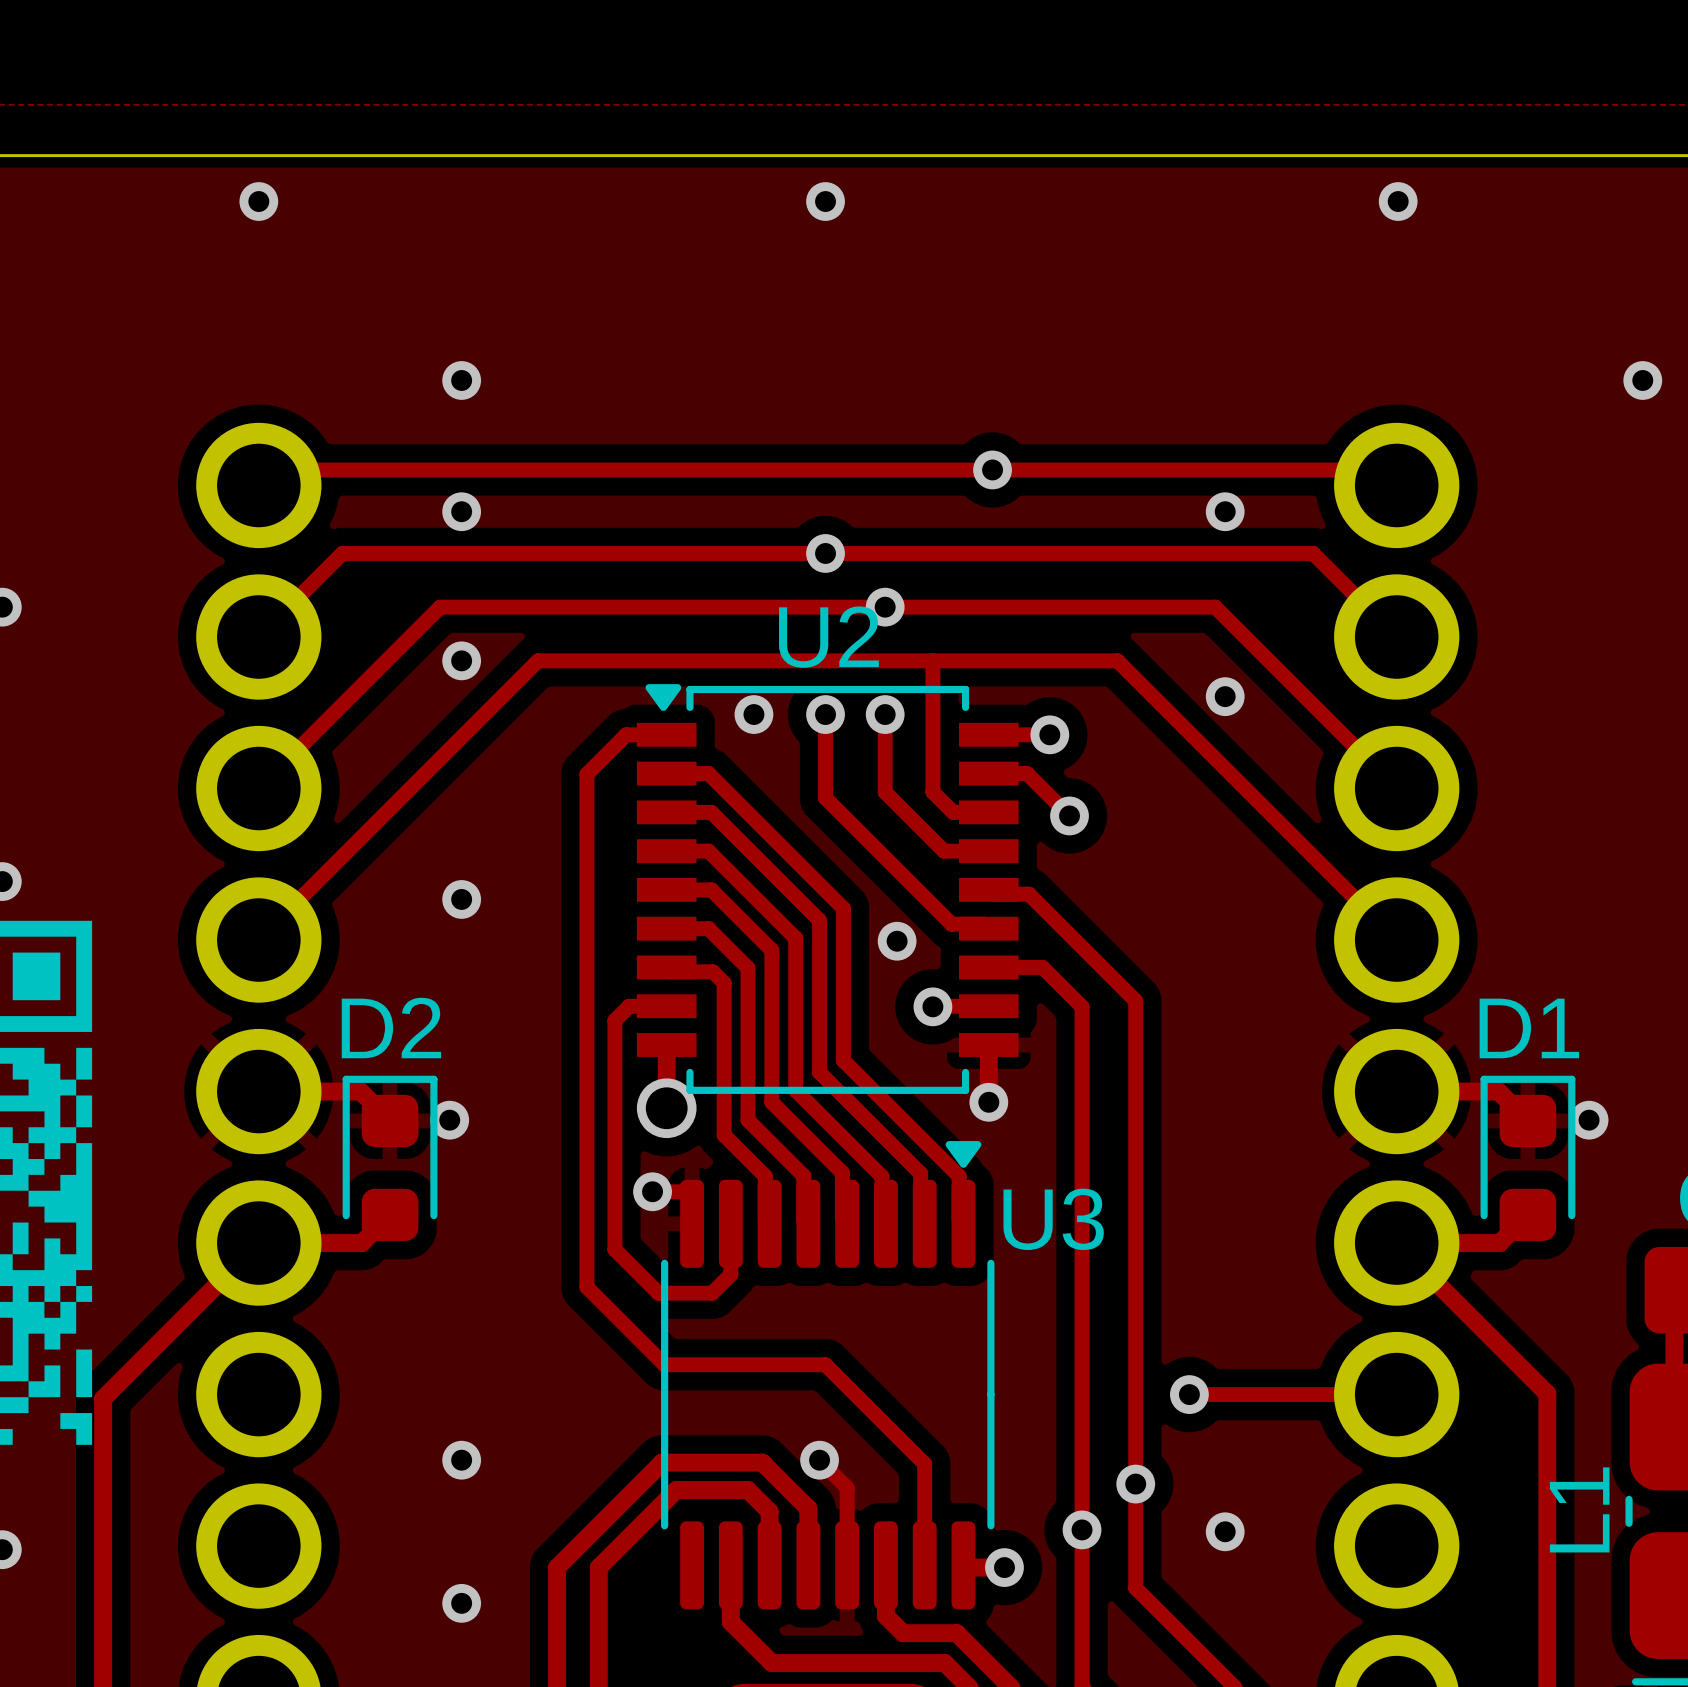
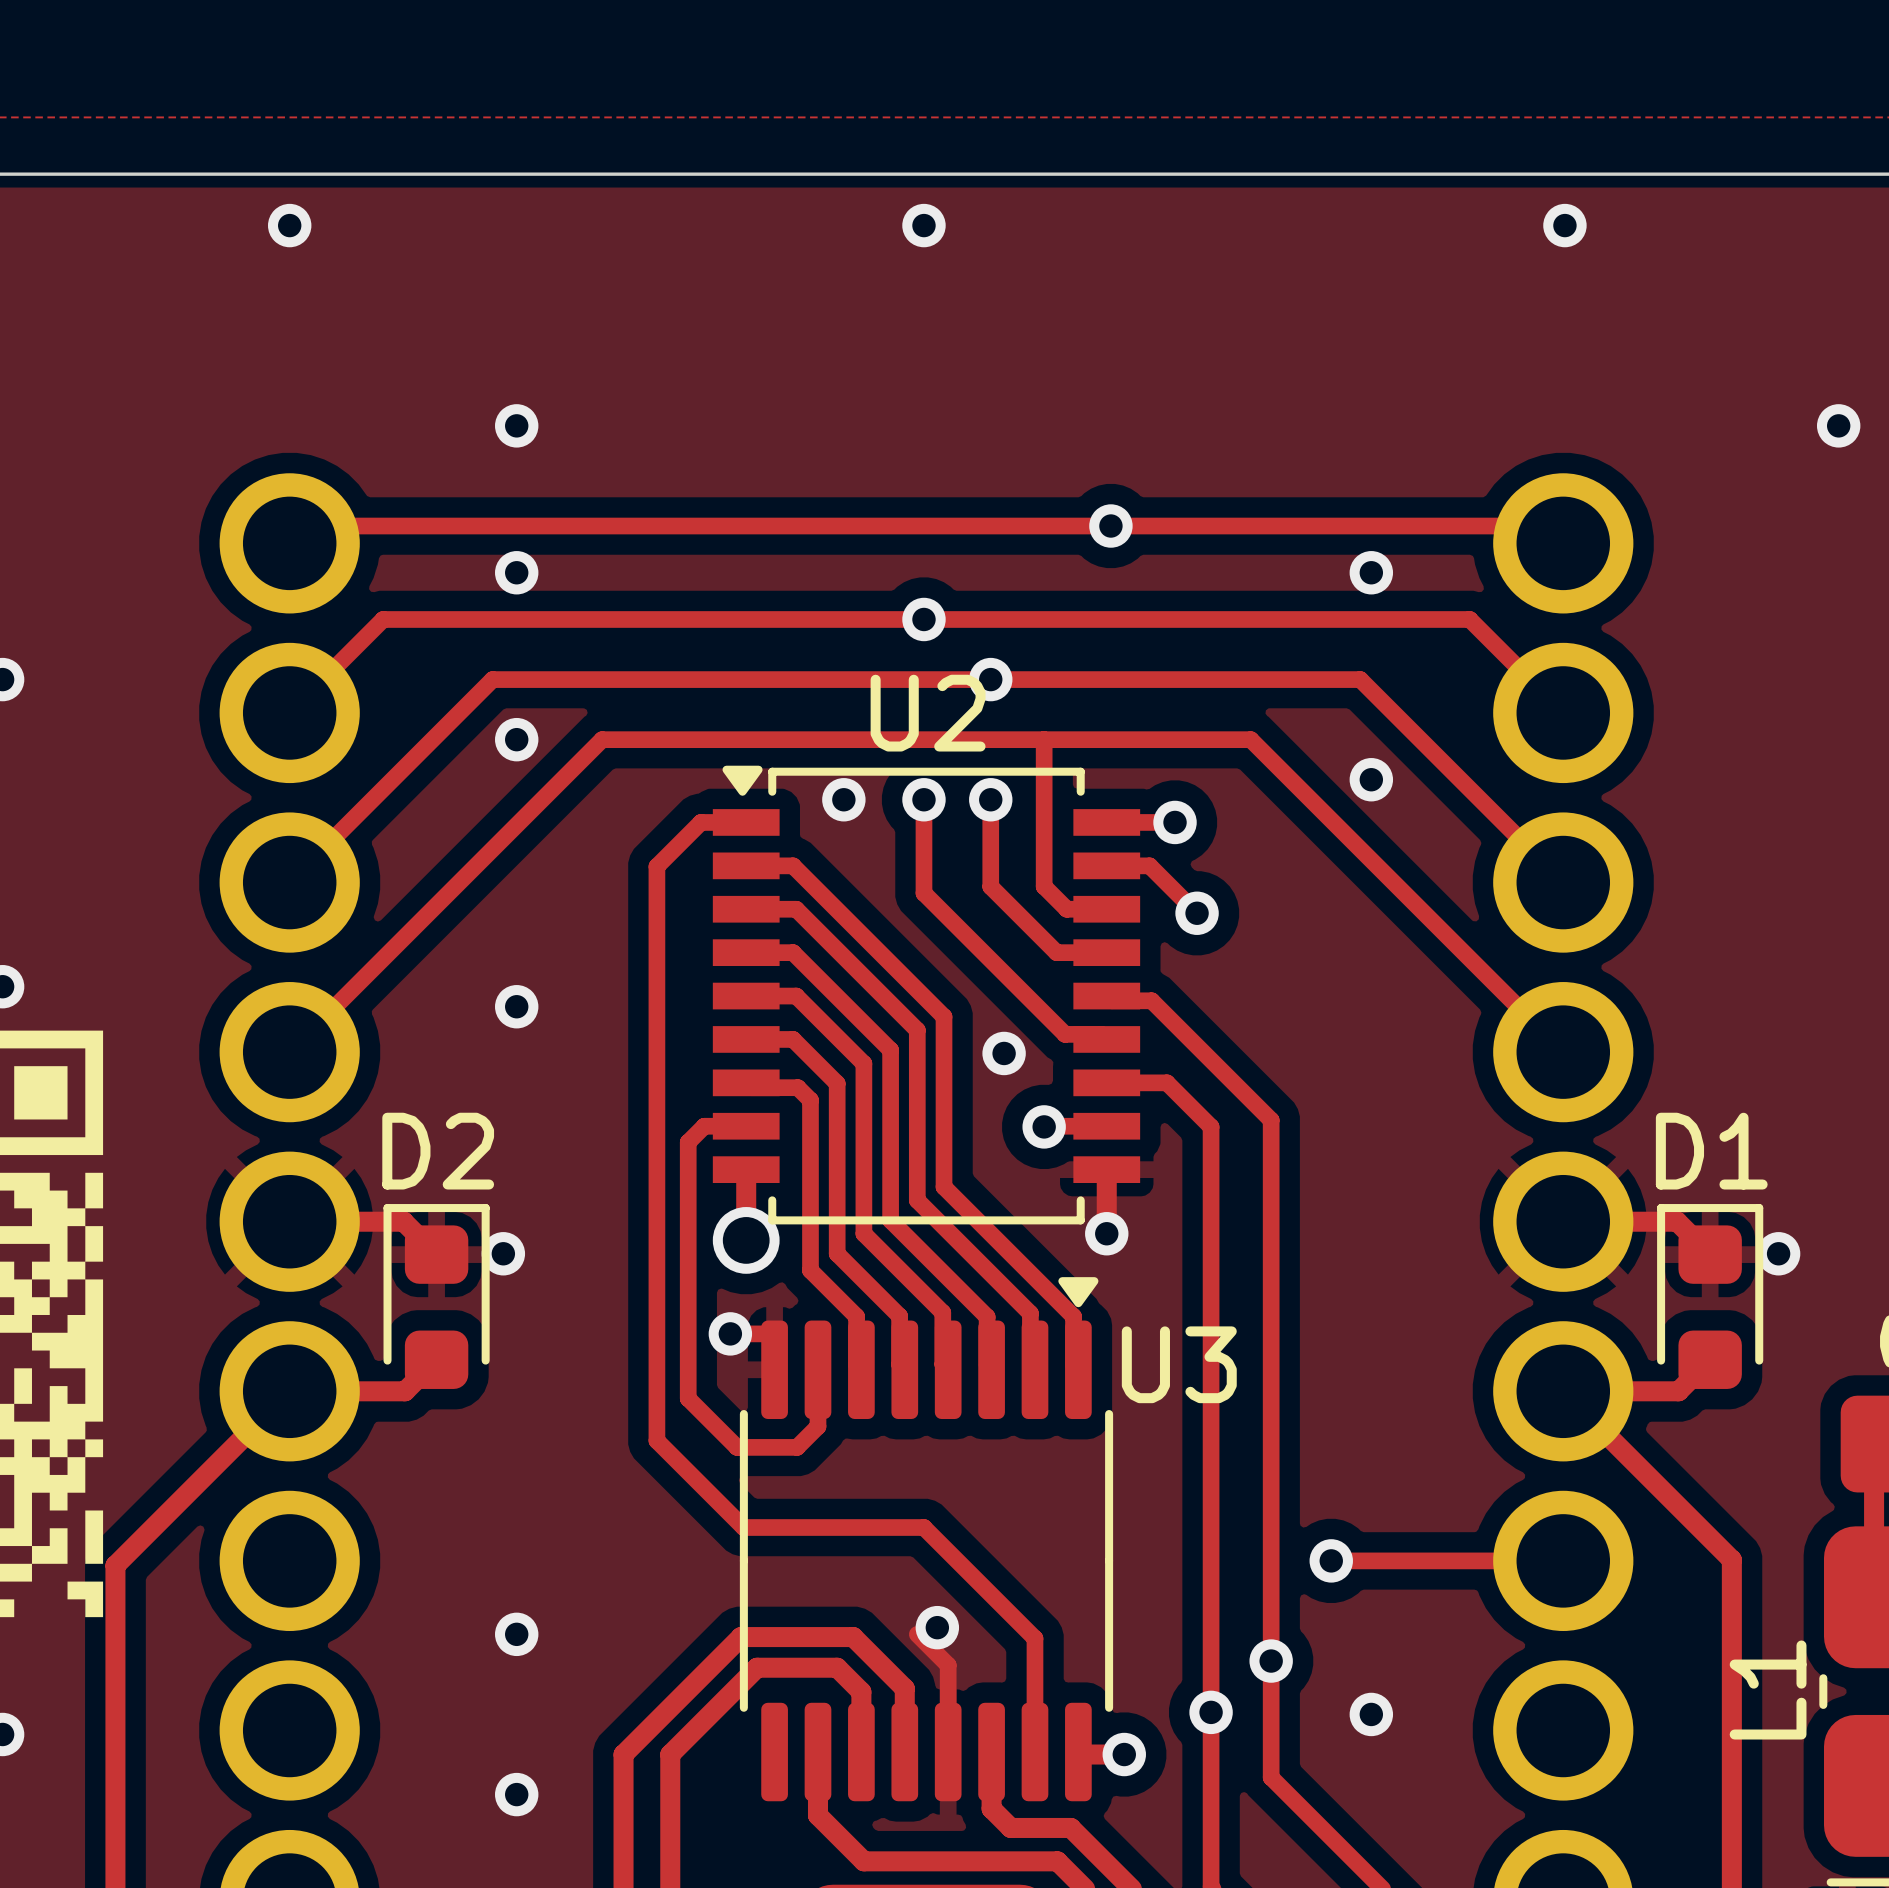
via position: (819, 1460) -> (937, 1627)

